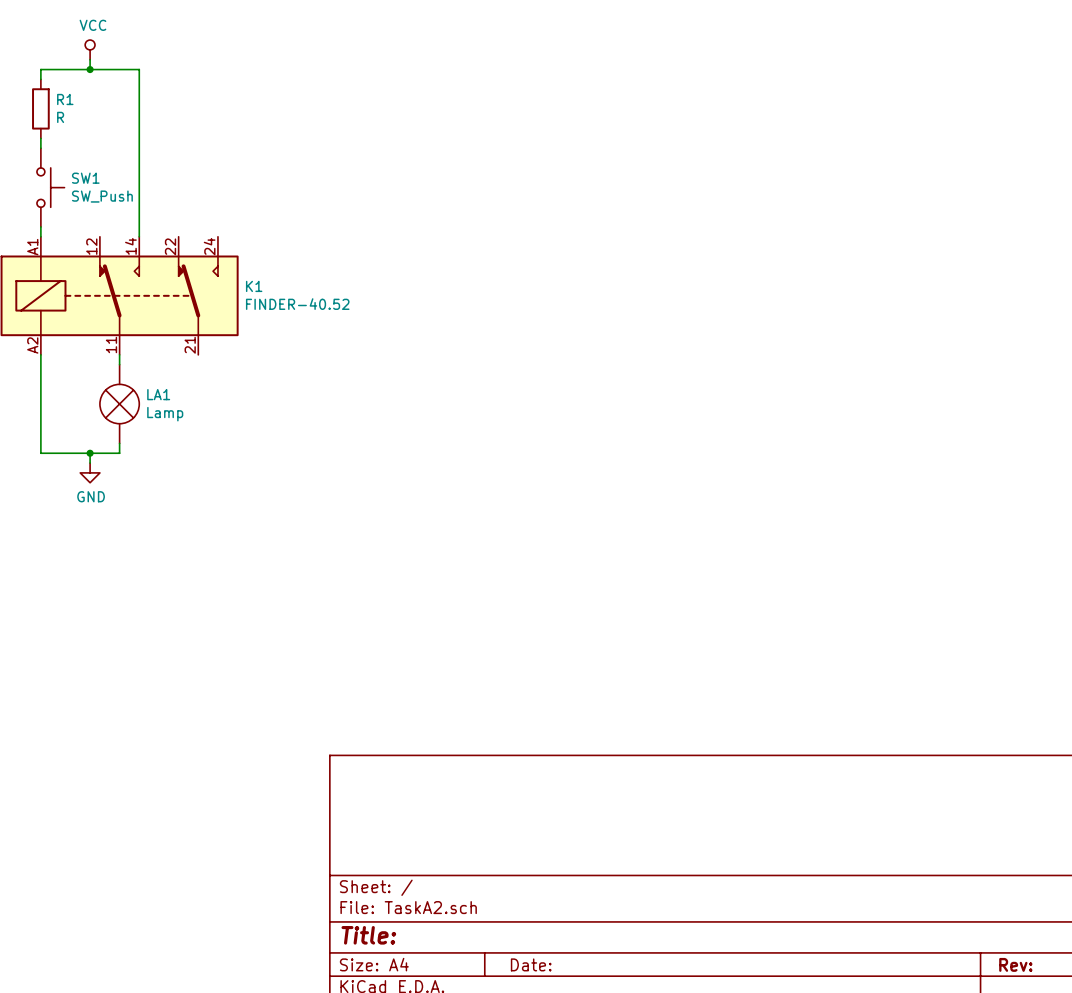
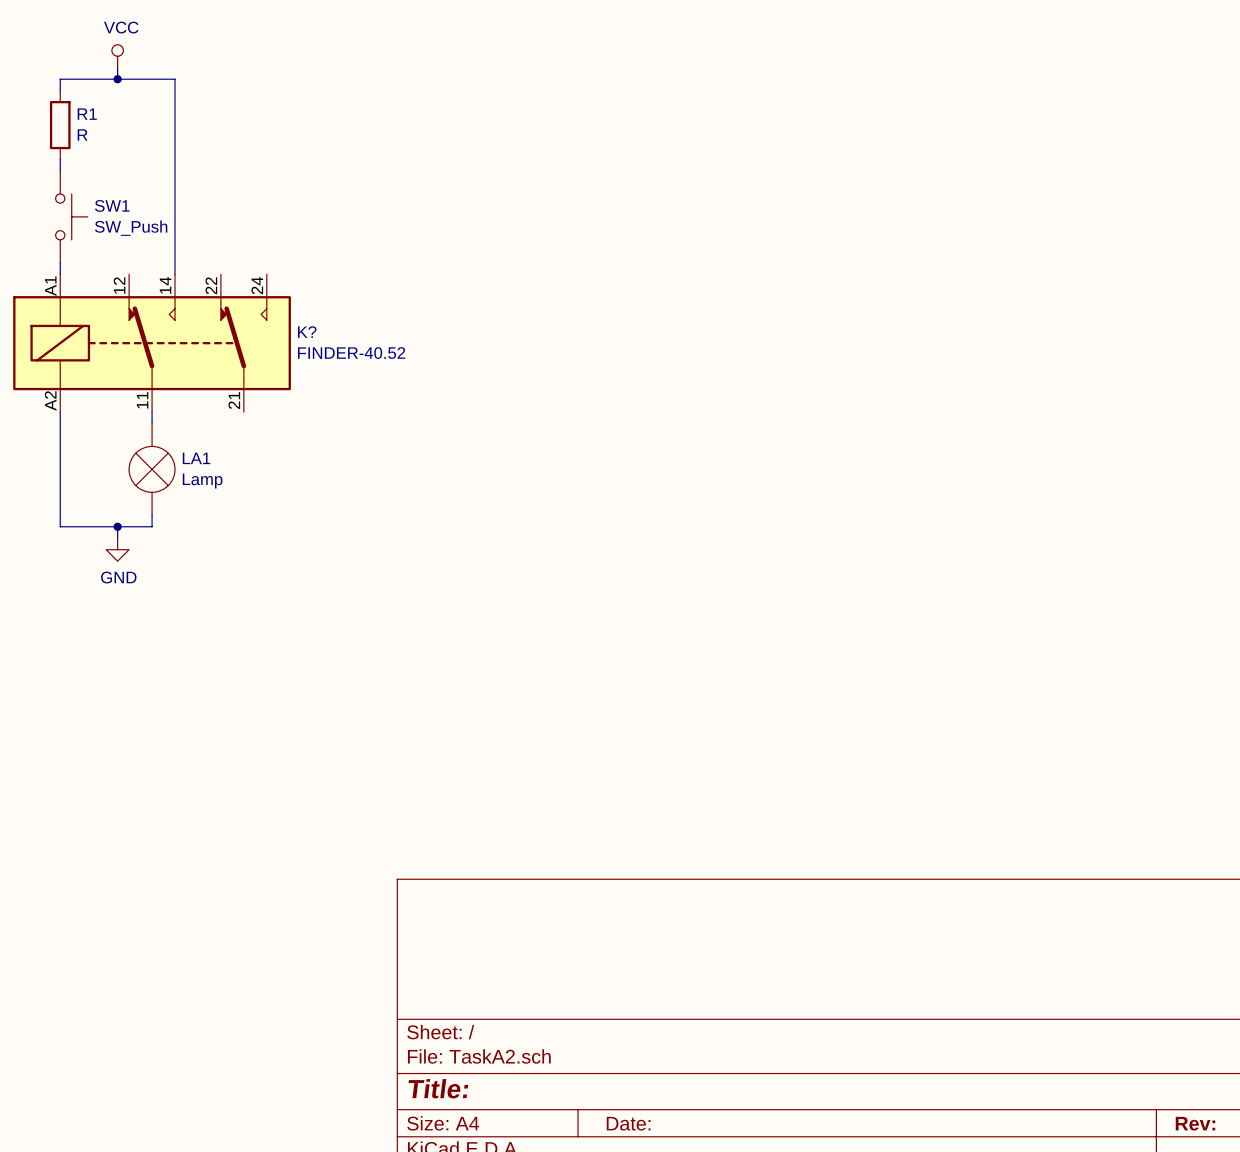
K1 name: K1 (254, 286) -> K? (307, 332)

